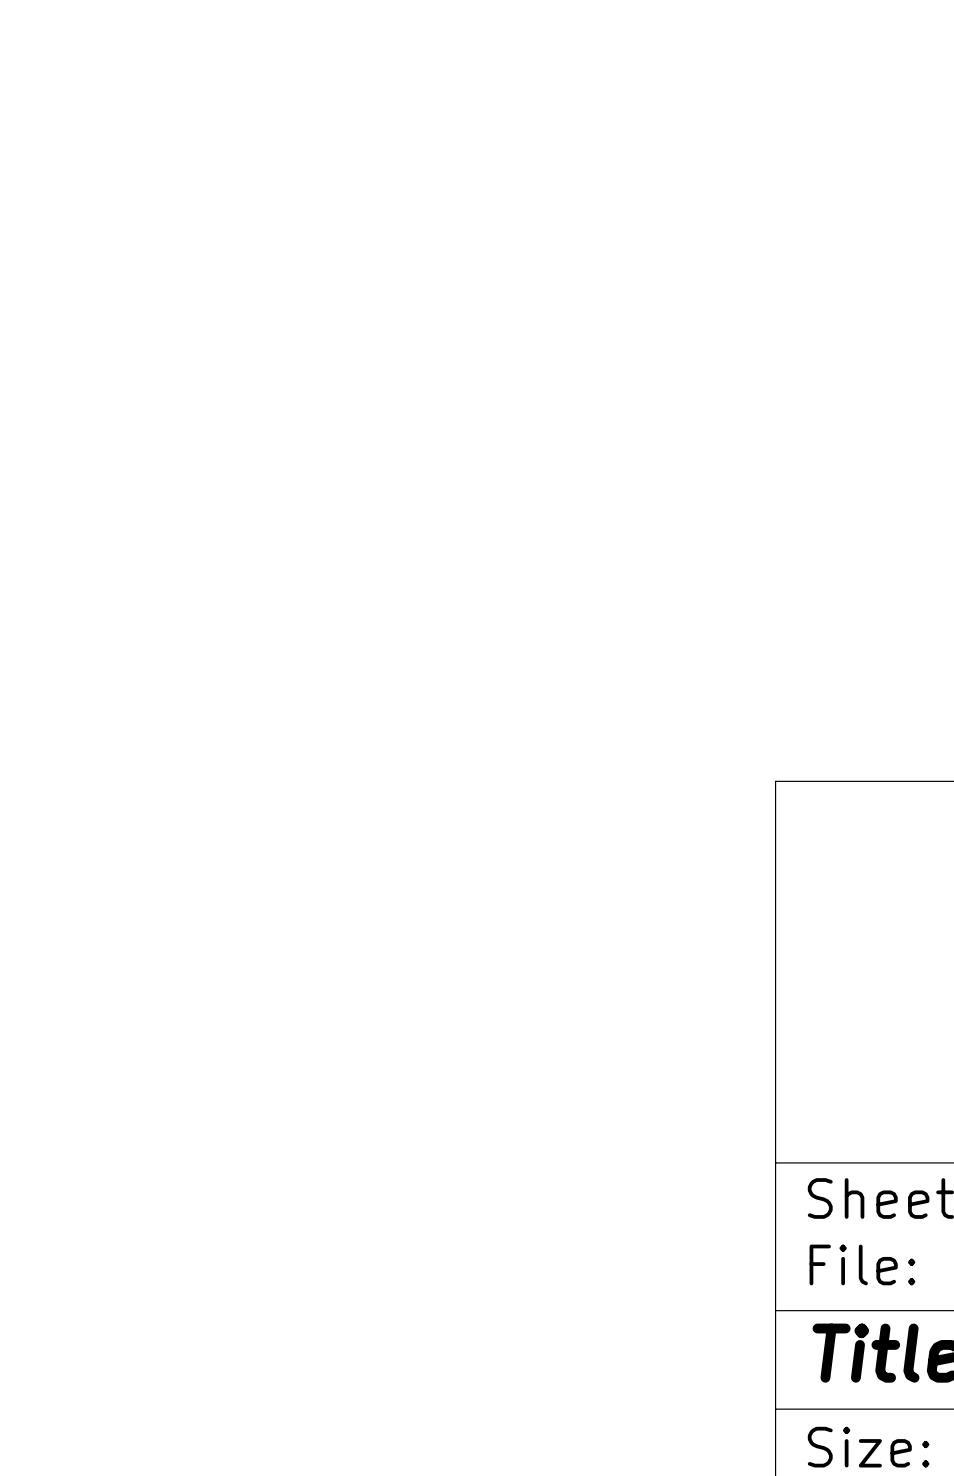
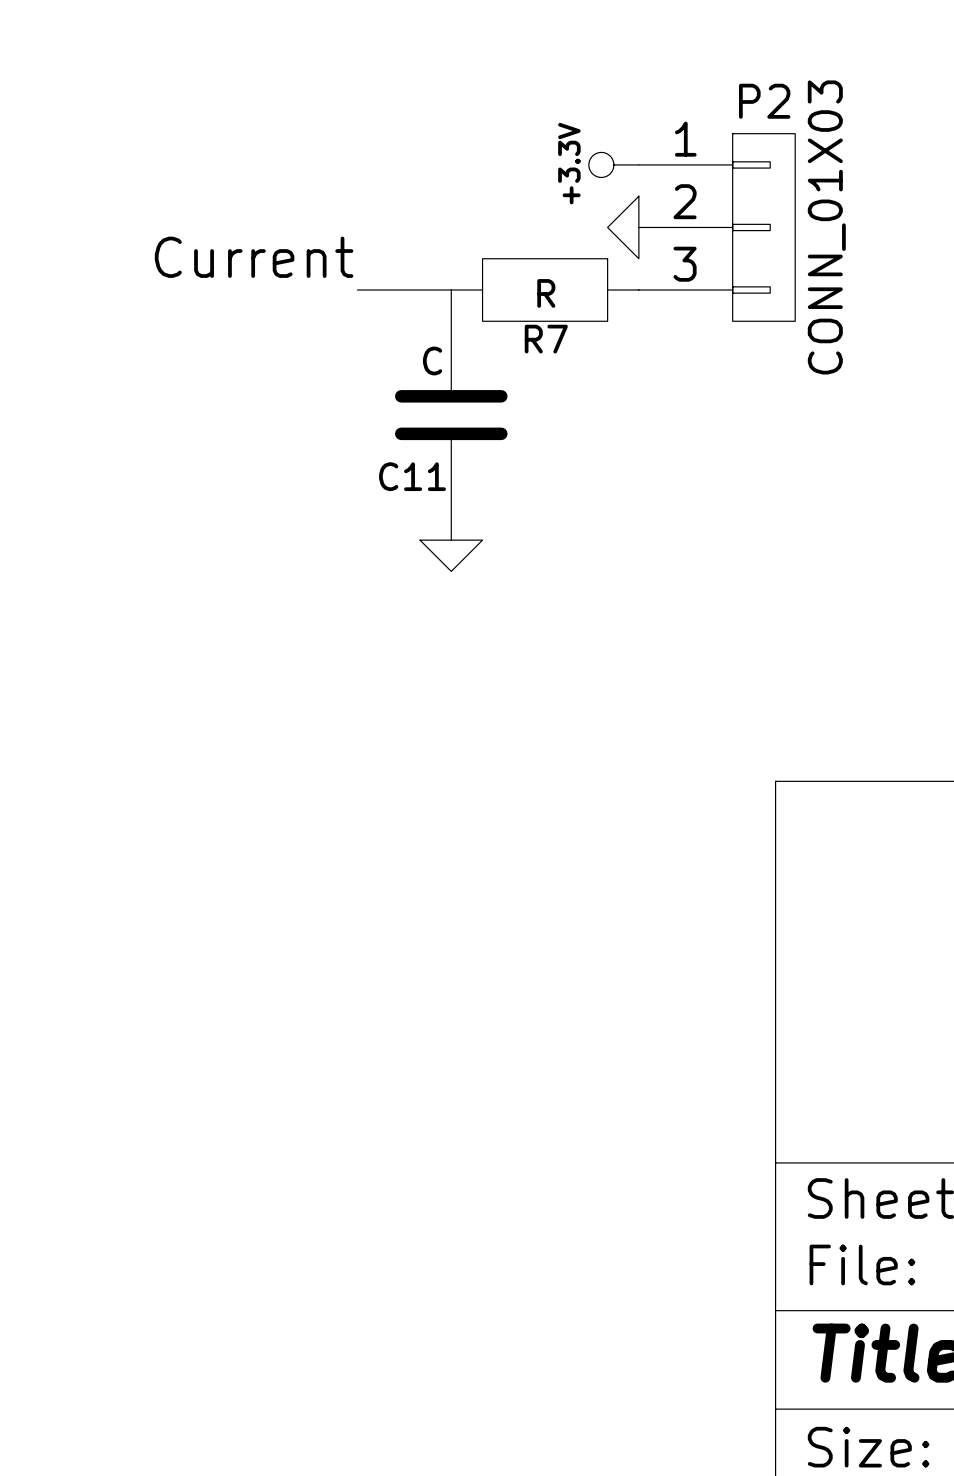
power symbol: none -> +3.3V (613, 164)
power symbol: none -> (623, 227)
P2: none -> CONN_01X03 (717, 227)
label: none -> Current (254, 257)
wire: none -> (357, 290) (451, 290)
R7: none -> R (545, 290)
C11: none -> C (451, 415)
power symbol: none -> (451, 555)

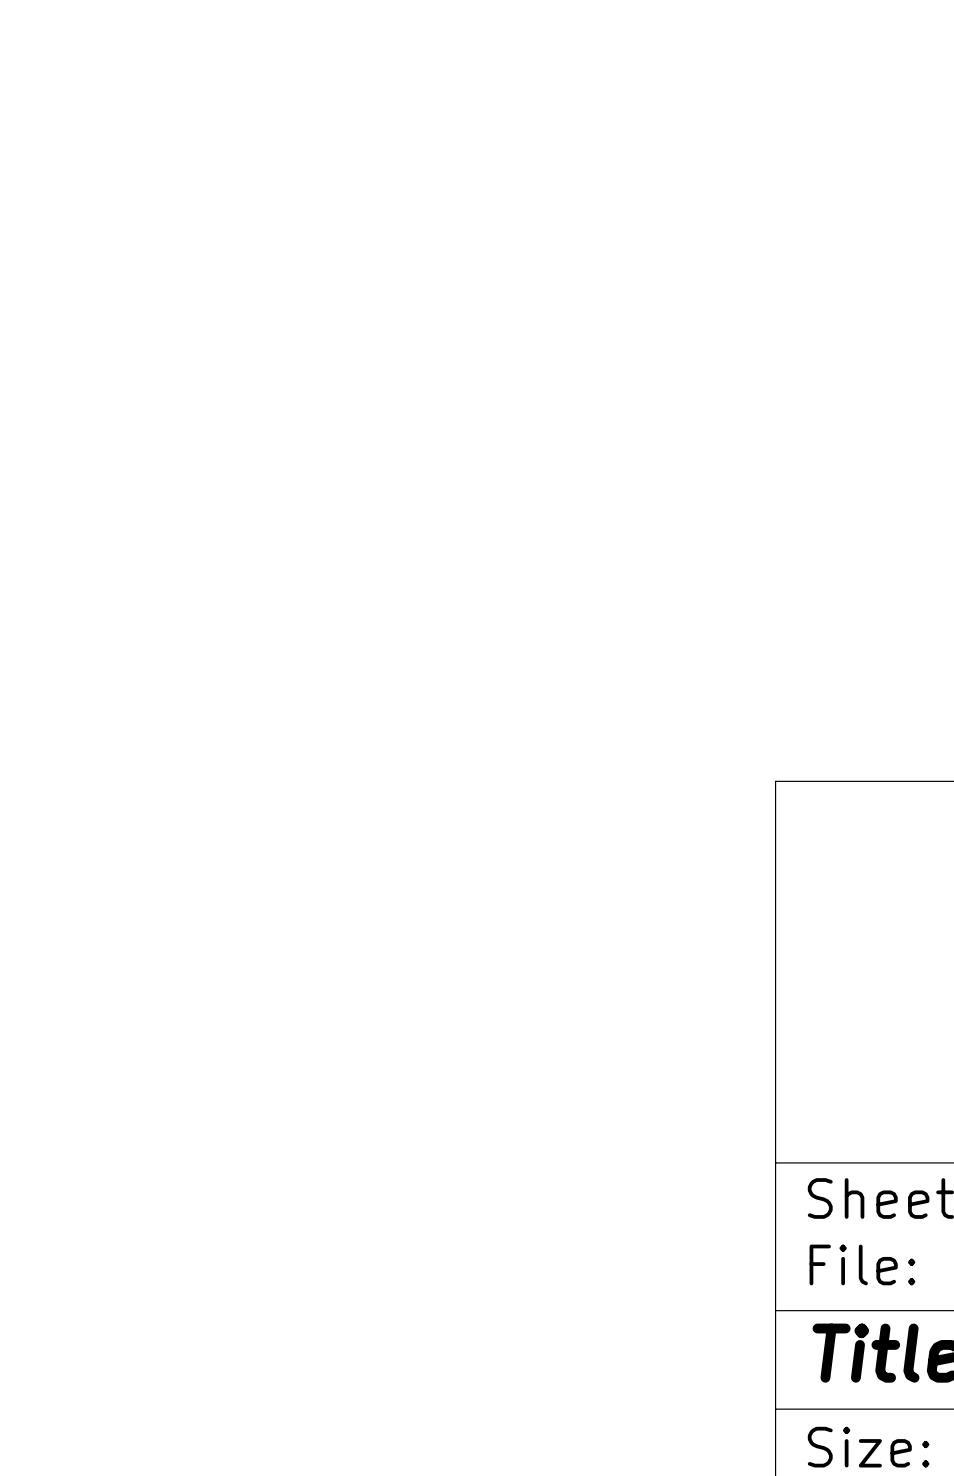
power symbol: +3.3V (613, 164) -> none
power symbol: (623, 227) -> none
P2: CONN_01X03 (717, 227) -> none
label: Current (254, 257) -> none
wire: (357, 290) (451, 290) -> none
R7: R (545, 290) -> none
C11: C (451, 415) -> none
power symbol: (451, 555) -> none

